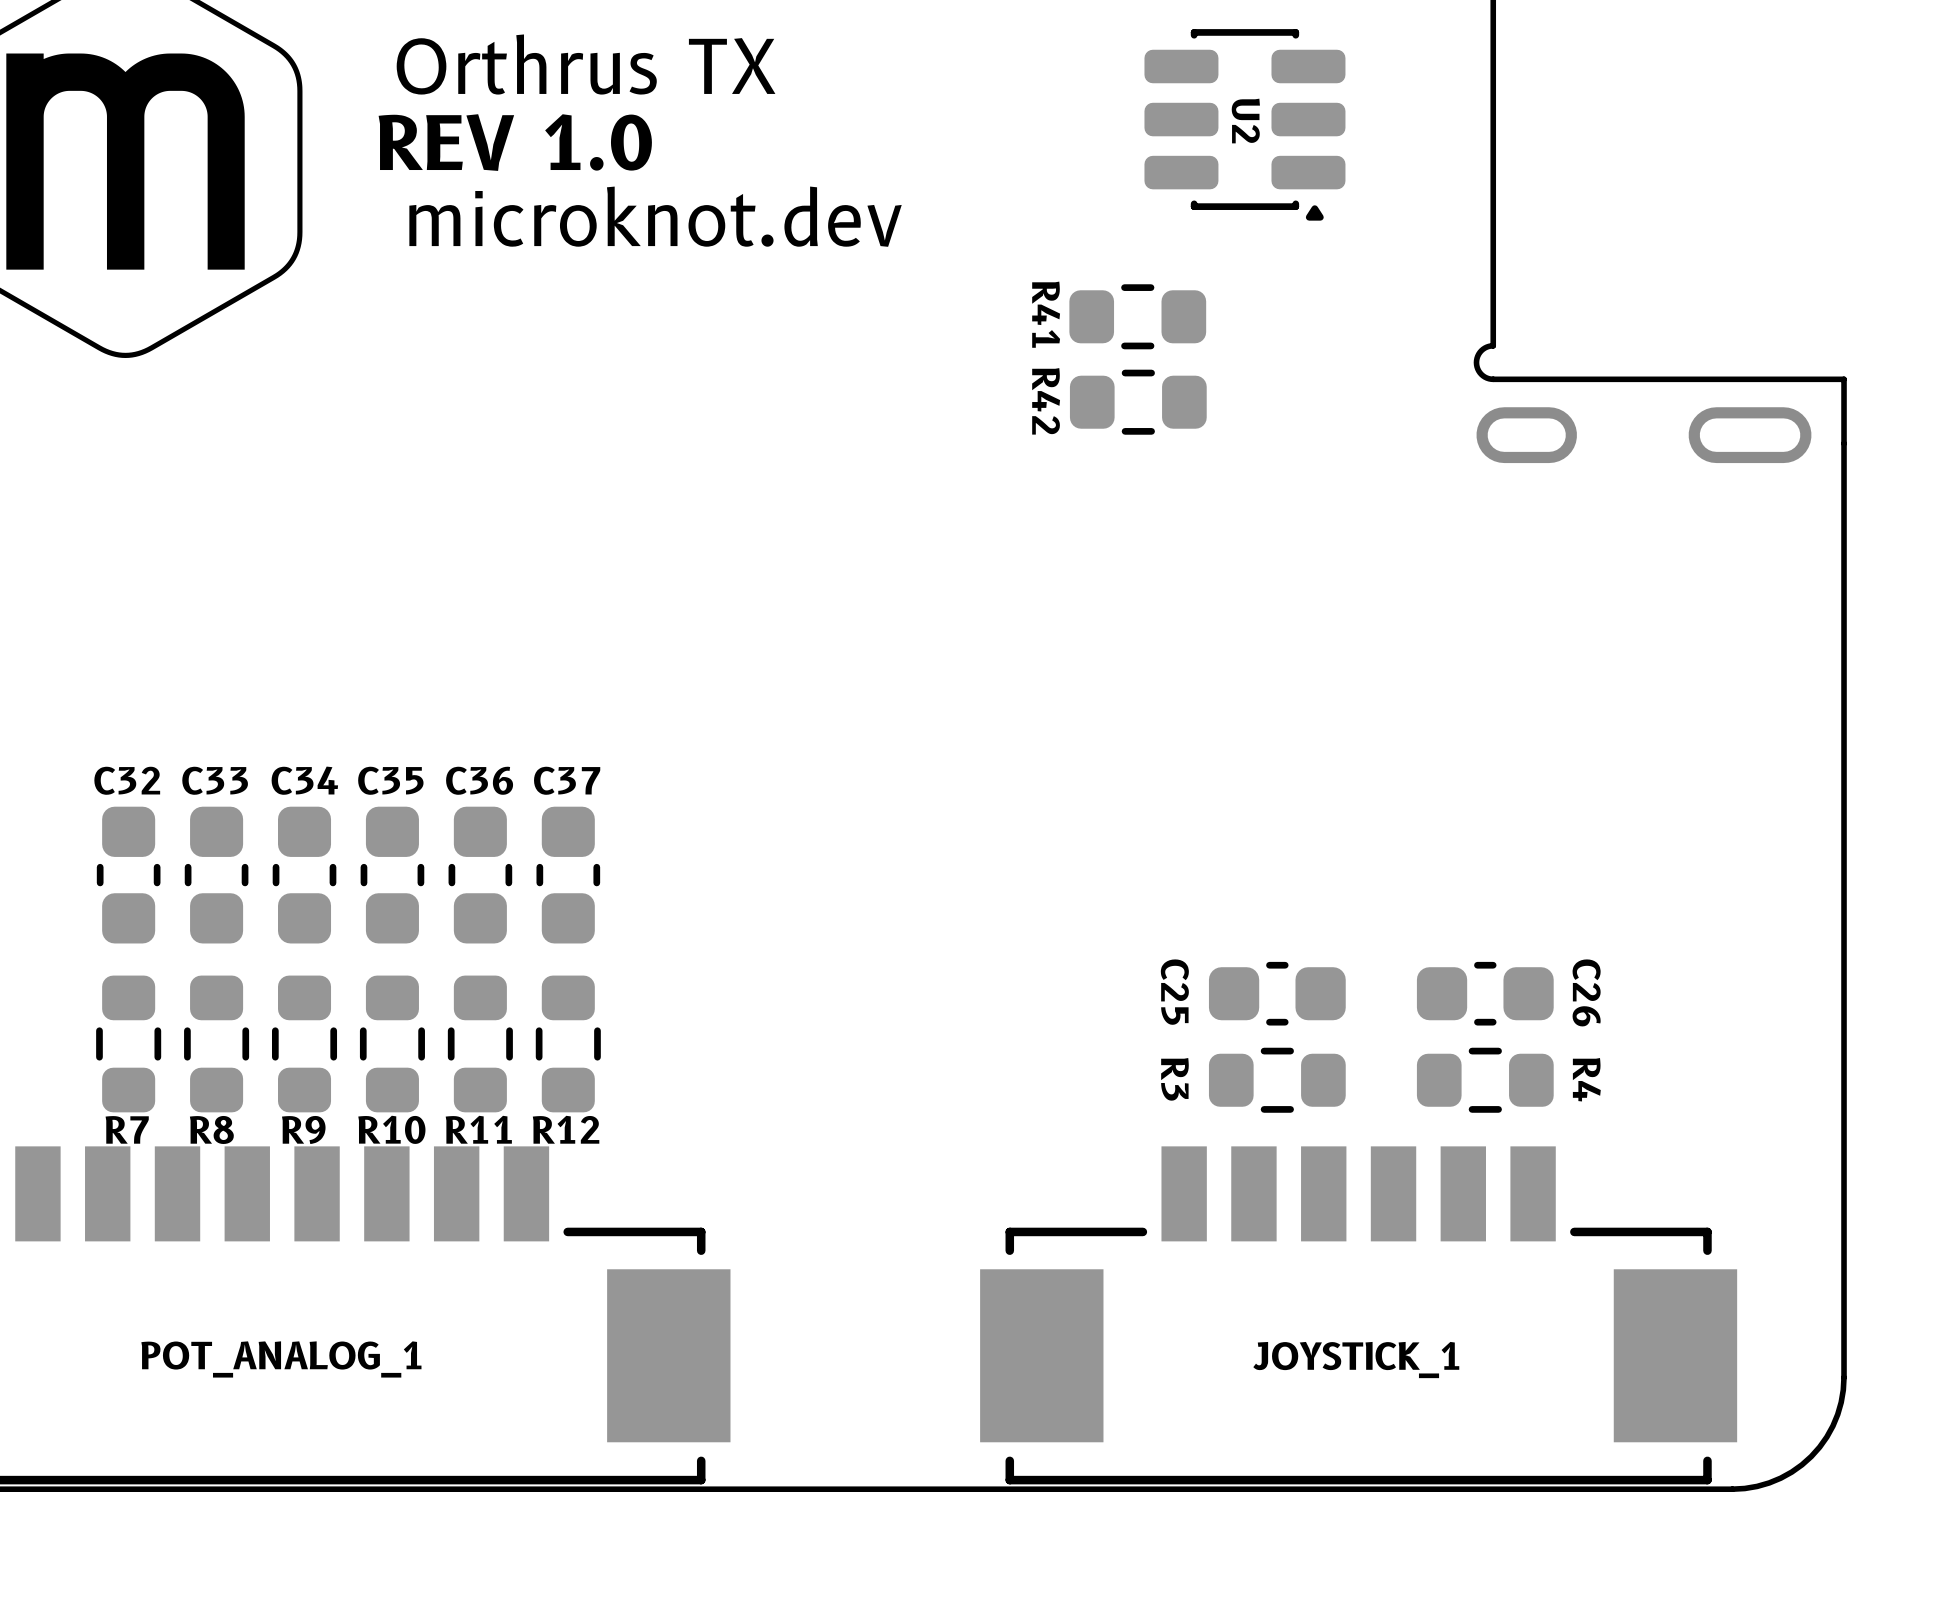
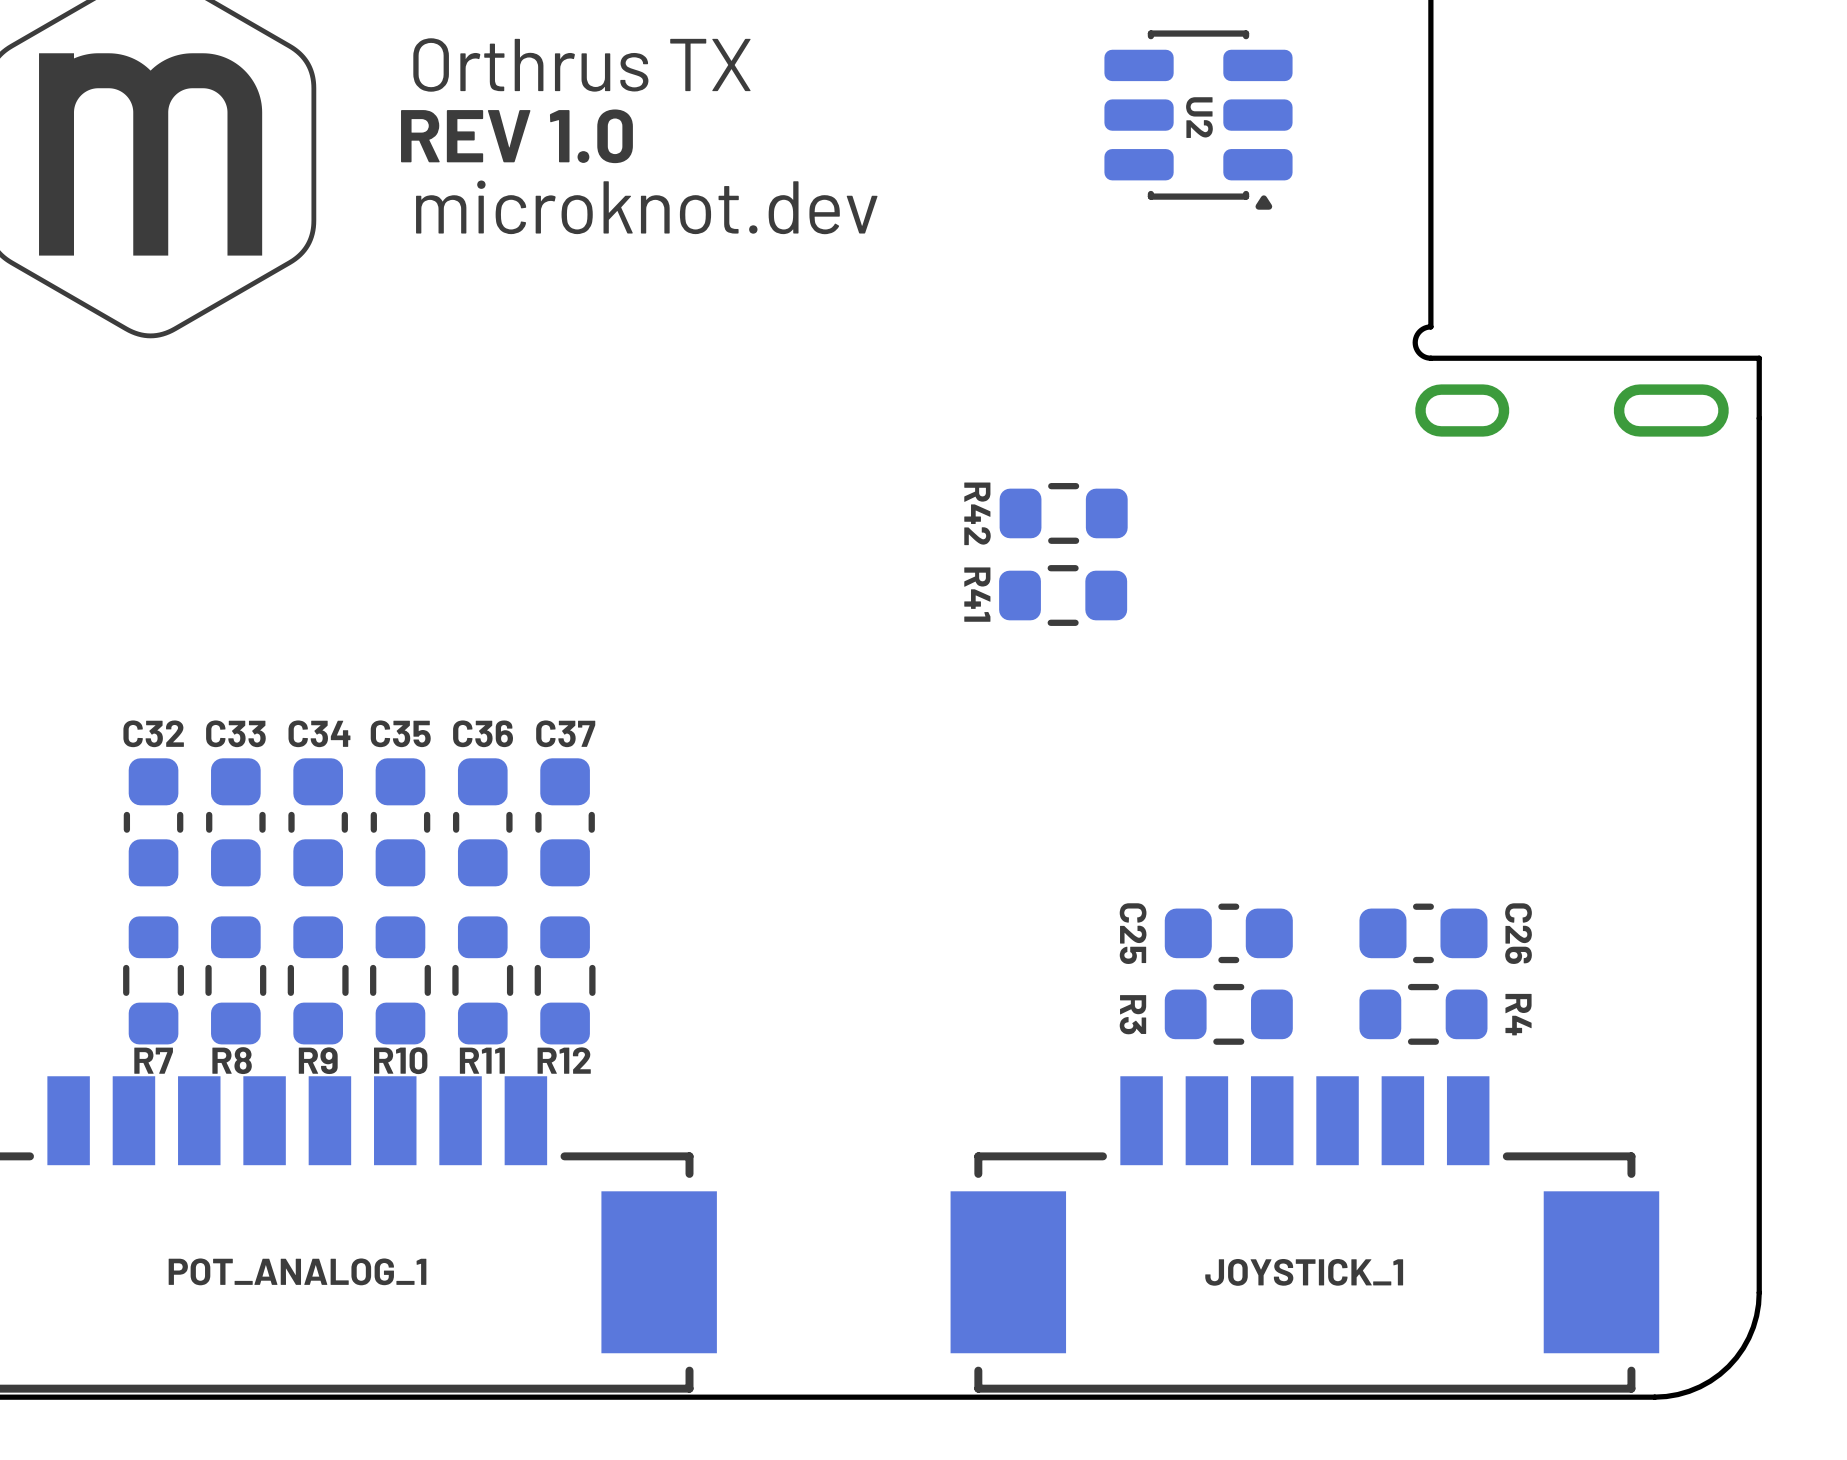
R41 position: (1137, 316) -> (1063, 595)
R42 position: (1138, 402) -> (1063, 513)

